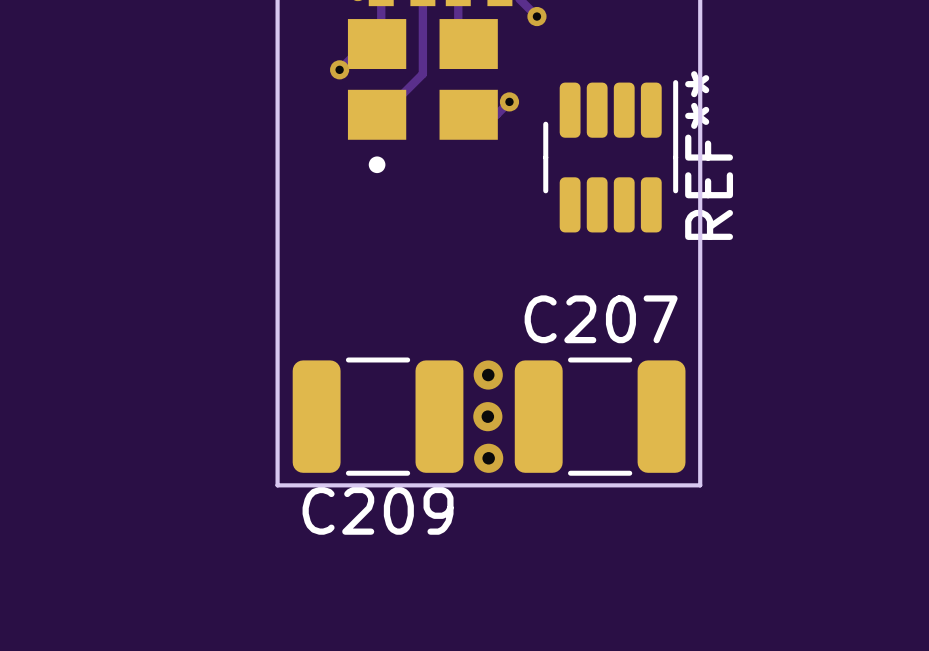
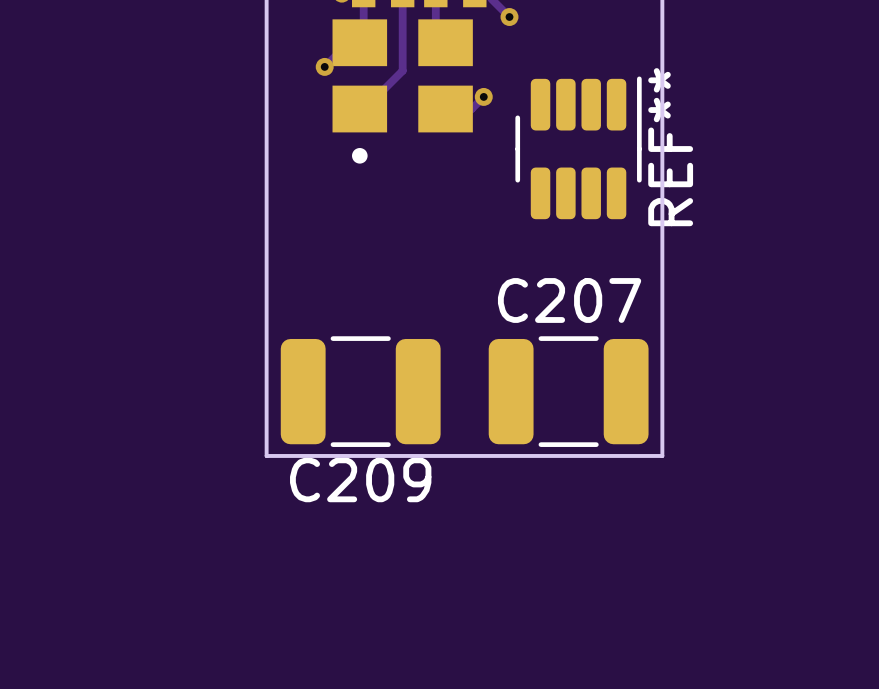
via: (488, 375) -> none
via: (487, 416) -> none
via: (488, 458) -> none

